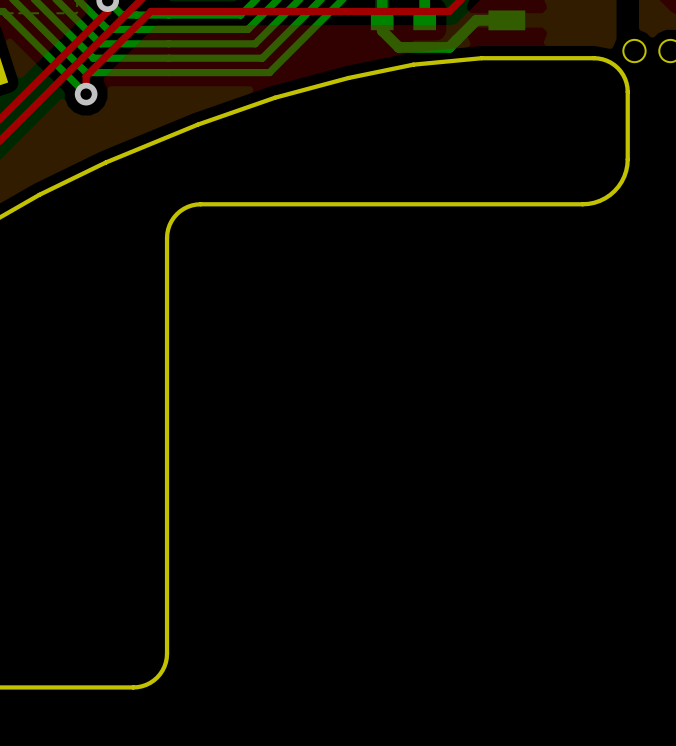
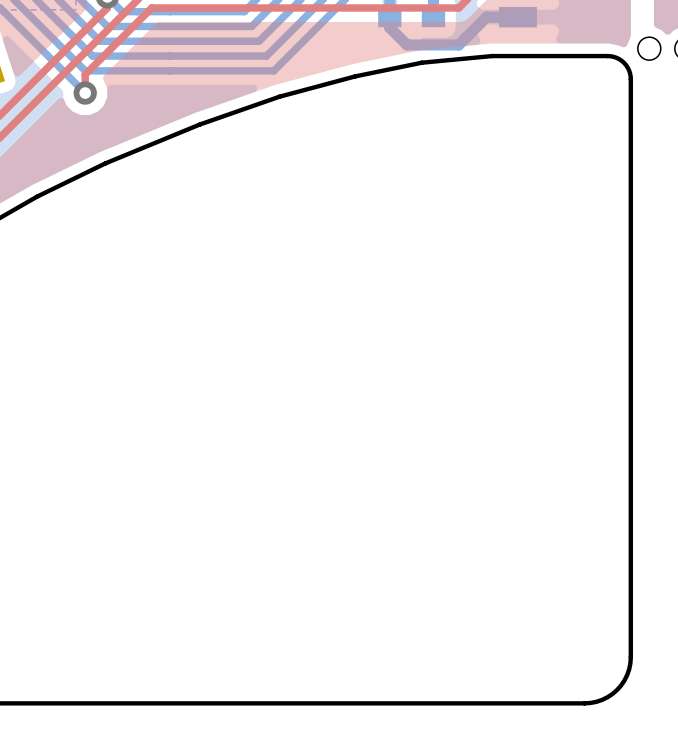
board edge: (594, 58) (606, 60) (617, 68) (625, 79) (627, 91) (626, 170) (621, 181) (614, 191) (599, 200) (582, 204) (200, 204) (187, 206) (174, 217) (168, 229) (167, 237) (166, 658) (164, 666) (157, 677) (146, 684) (133, 687) -> (607, 56) (616, 57) (624, 62) (629, 70) (630, 79) (630, 657) (629, 669) (621, 685) (612, 693) (602, 699) (584, 703) (133, 703)

